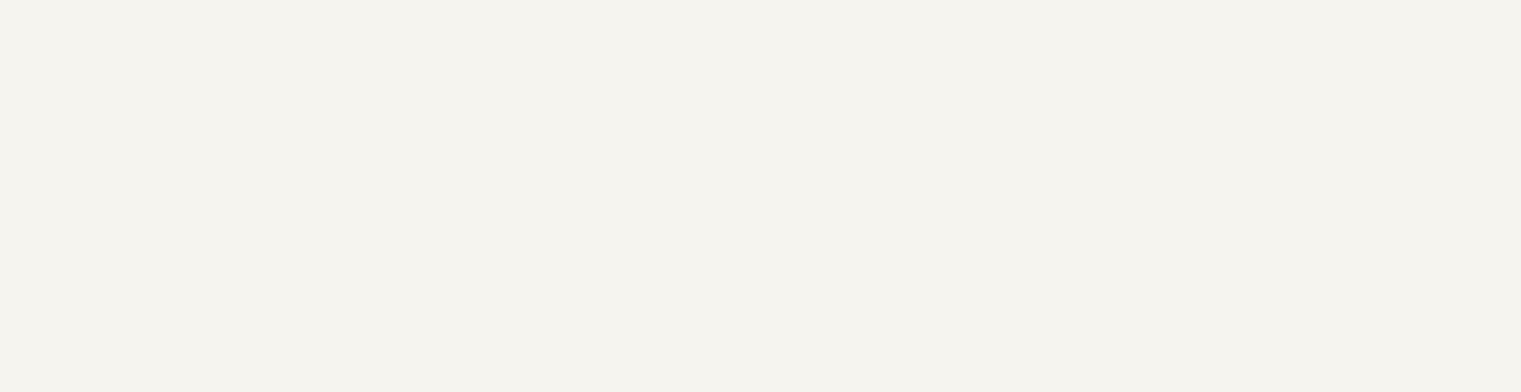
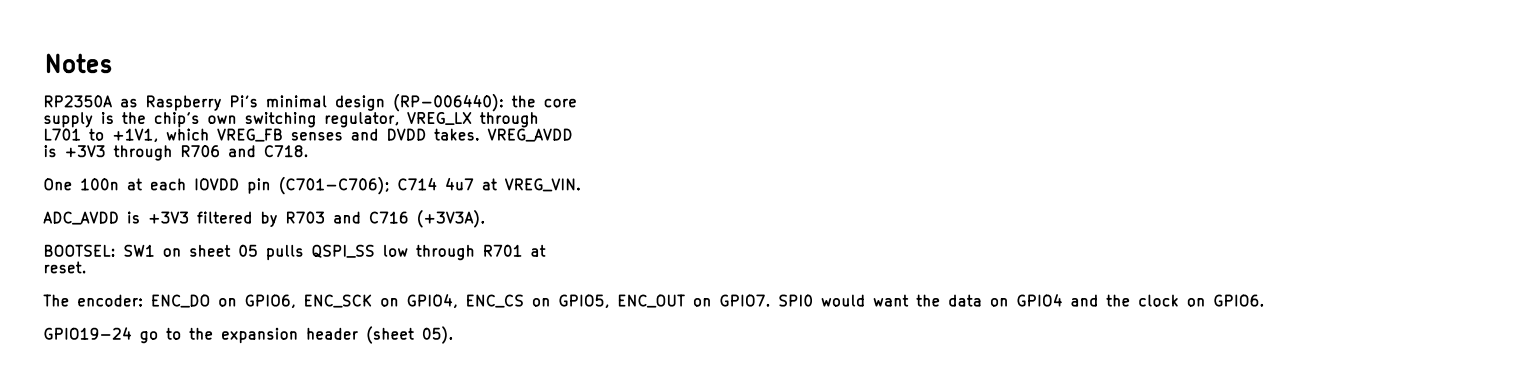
text: none -> Notes (79, 63)
text: none -> RP2350A as Raspberry Pi's minimal design (RP-006440): the core (310, 102)
text: none -> supply is the chip's own switching regulator, VREG_LX through (290, 119)
text: none -> L701 to +1V1, which VREG_FB senses and DVDD takes. VREG_AVDD (308, 135)
text: none -> is +3V3 through R706 and C718. (175, 152)
text: none -> One 100n at each IOVDD pin (C701-C706); C714 4u7 at VREG_VIN. (312, 185)
text: none -> ADC_AVDD is +3V3 filtered by R703 and C716 (+3V3A). (263, 218)
text: none -> BOOTSEL: SW1 on sheet 05 pulls QSPI_SS low through R701 at (295, 252)
text: none -> reset. (65, 267)
text: none -> The encoder: ENC_DO on GPIO6, ENC_SCK on GPIO4, ENC_CS on GPIO5, ENC_OUT on GPIO7. SPI0 would want the data on GPIO4 and the clock on GPIO6. (653, 301)
text: none -> GPIO19-24 go to the expansion header (sheet 05). (248, 335)

